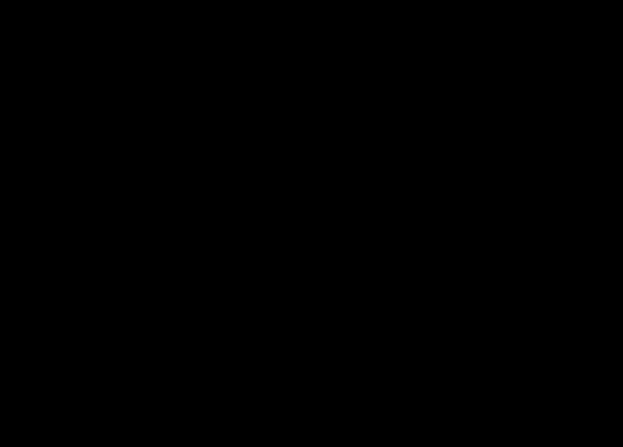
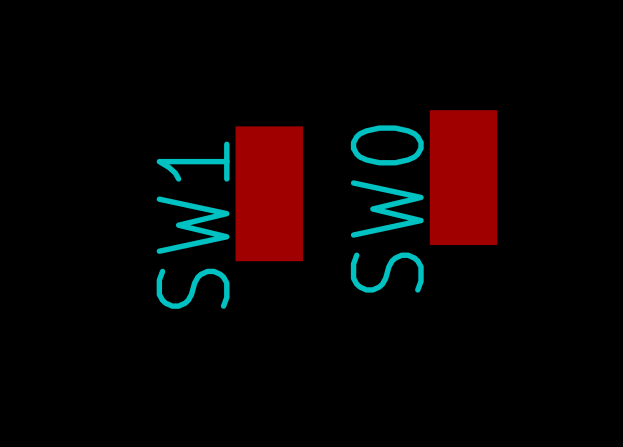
SW0: none -> (463, 177)
SW1: none -> (269, 193)

